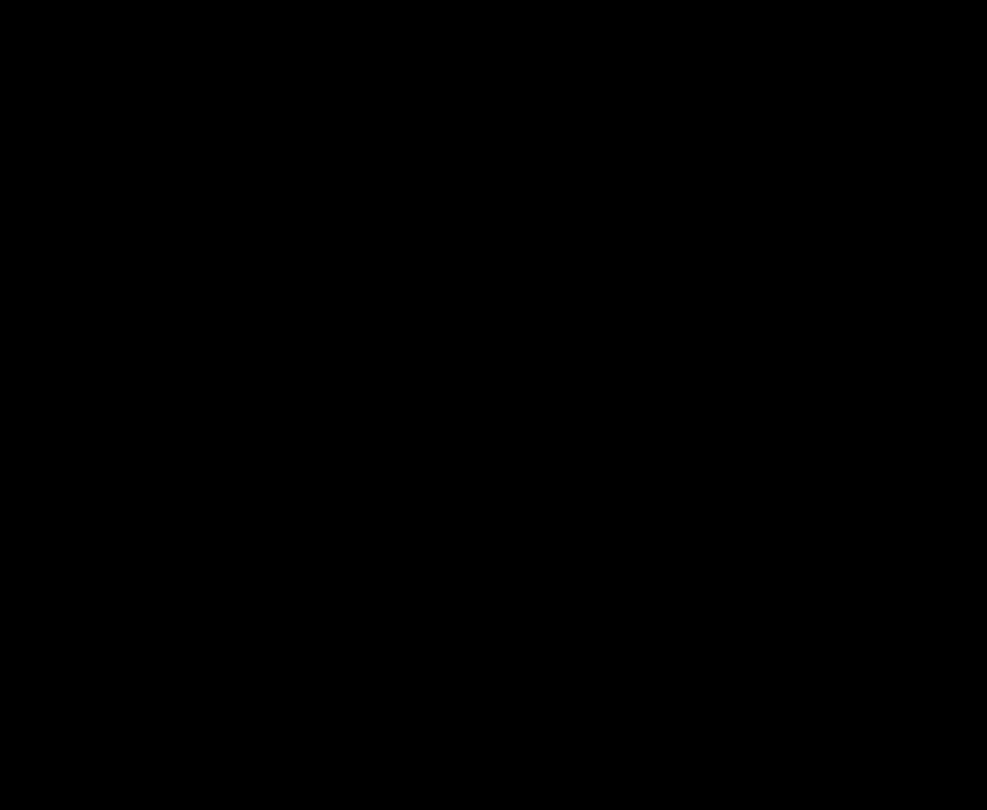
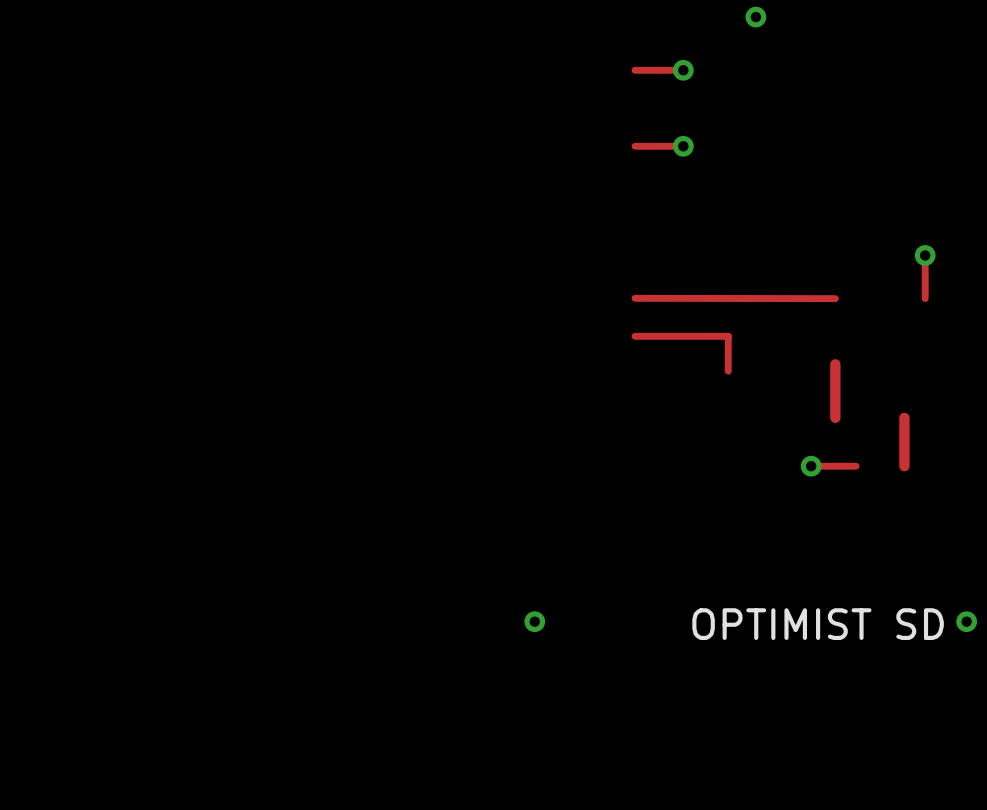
via: none -> (755, 17)
top track: none -> (634, 70) (683, 70)
via: none -> (683, 70)
top track: none -> (634, 146) (683, 146)
via: none -> (683, 146)
top track: none -> (925, 255) (925, 298)
via: none -> (925, 255)
top track: none -> (634, 298) (835, 298)
top track: none -> (634, 336) (728, 336) (728, 371)
top track: none -> (835, 364) (835, 417)
top track: none -> (904, 417) (904, 466)
top track: none -> (811, 466) (856, 466)
via: none -> (811, 466)
via: none -> (534, 621)
via: none -> (966, 621)
text: none -> OPTIMIST SD (818, 624)

